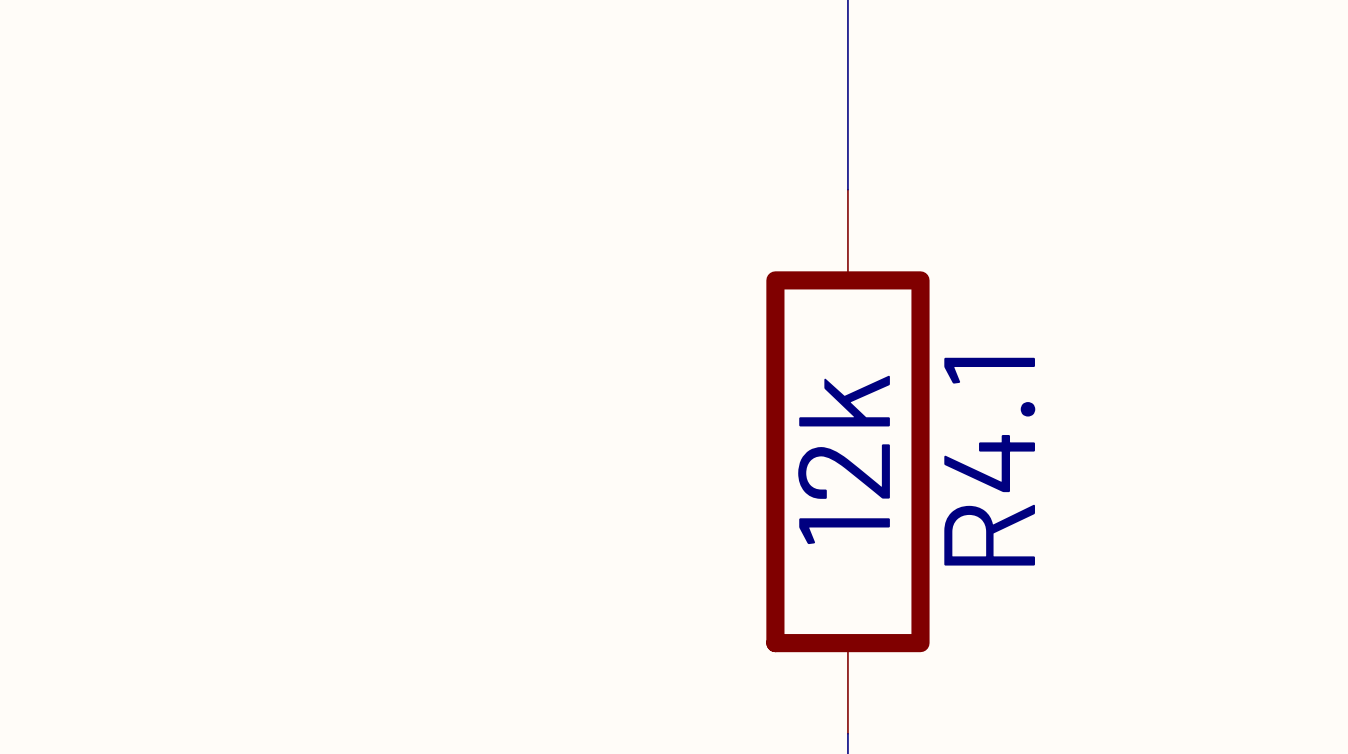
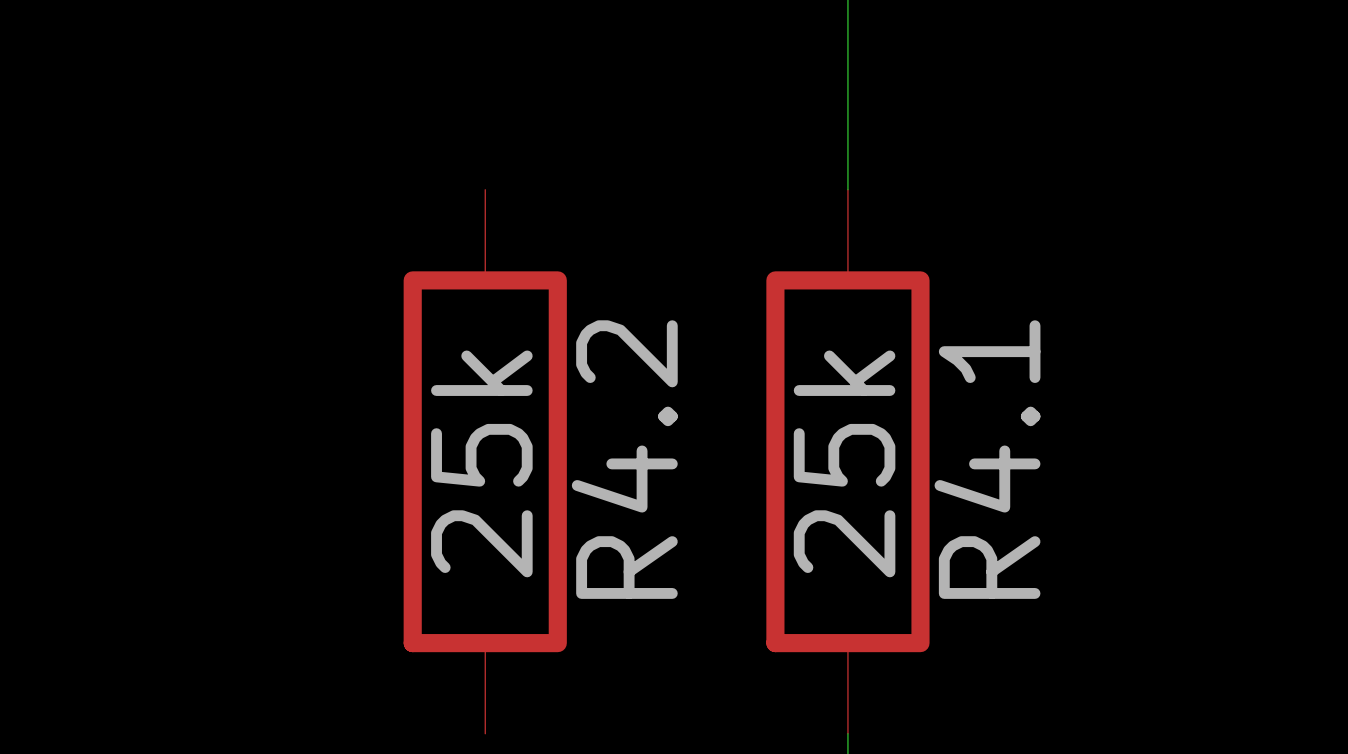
R4.1 value: 12k (844, 459) -> 25k (844, 463)
R4.2: none -> 25k (485, 461)

